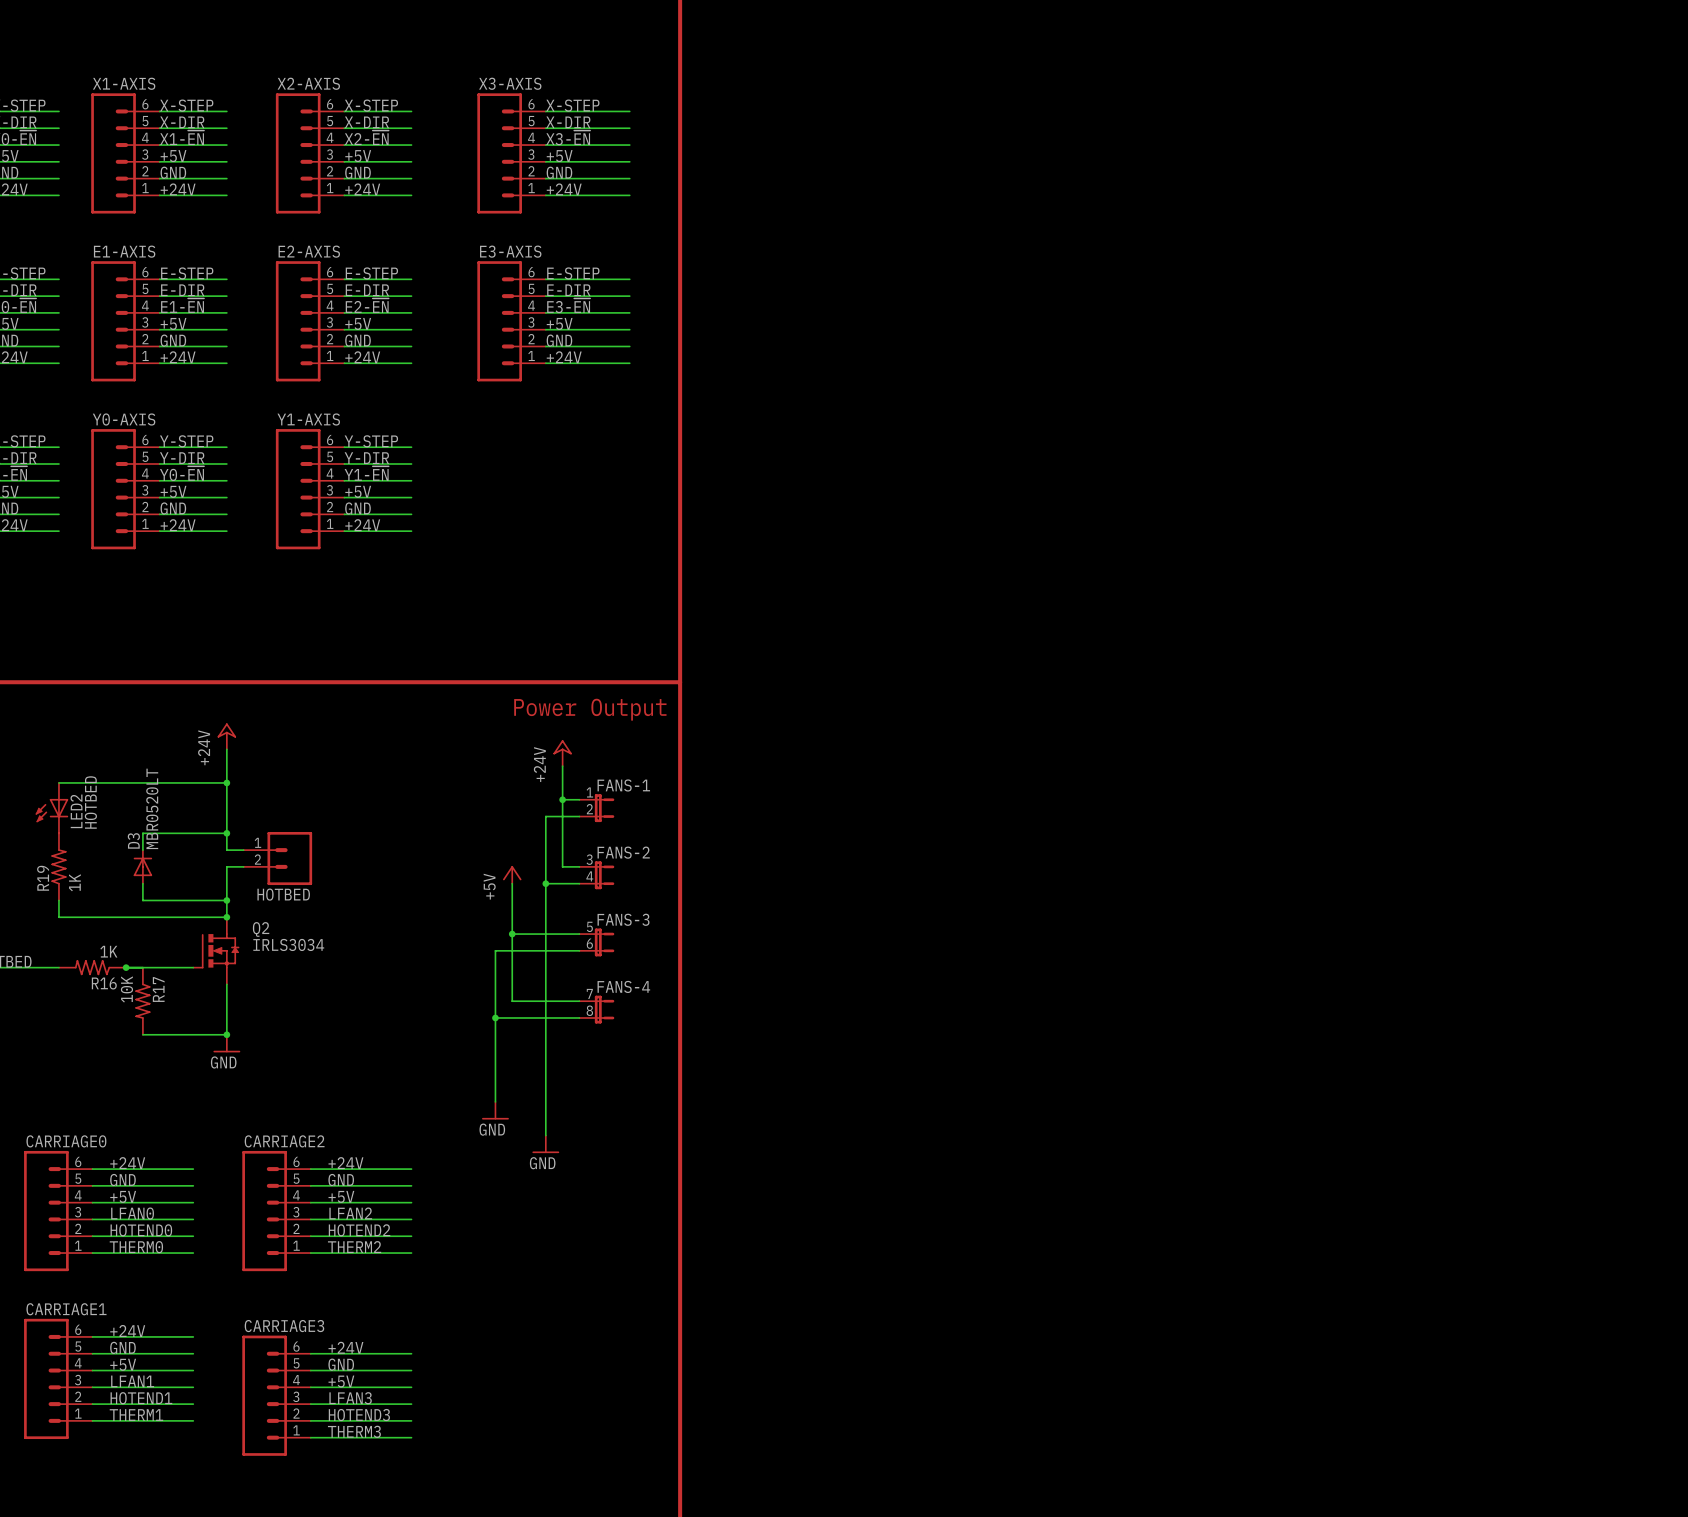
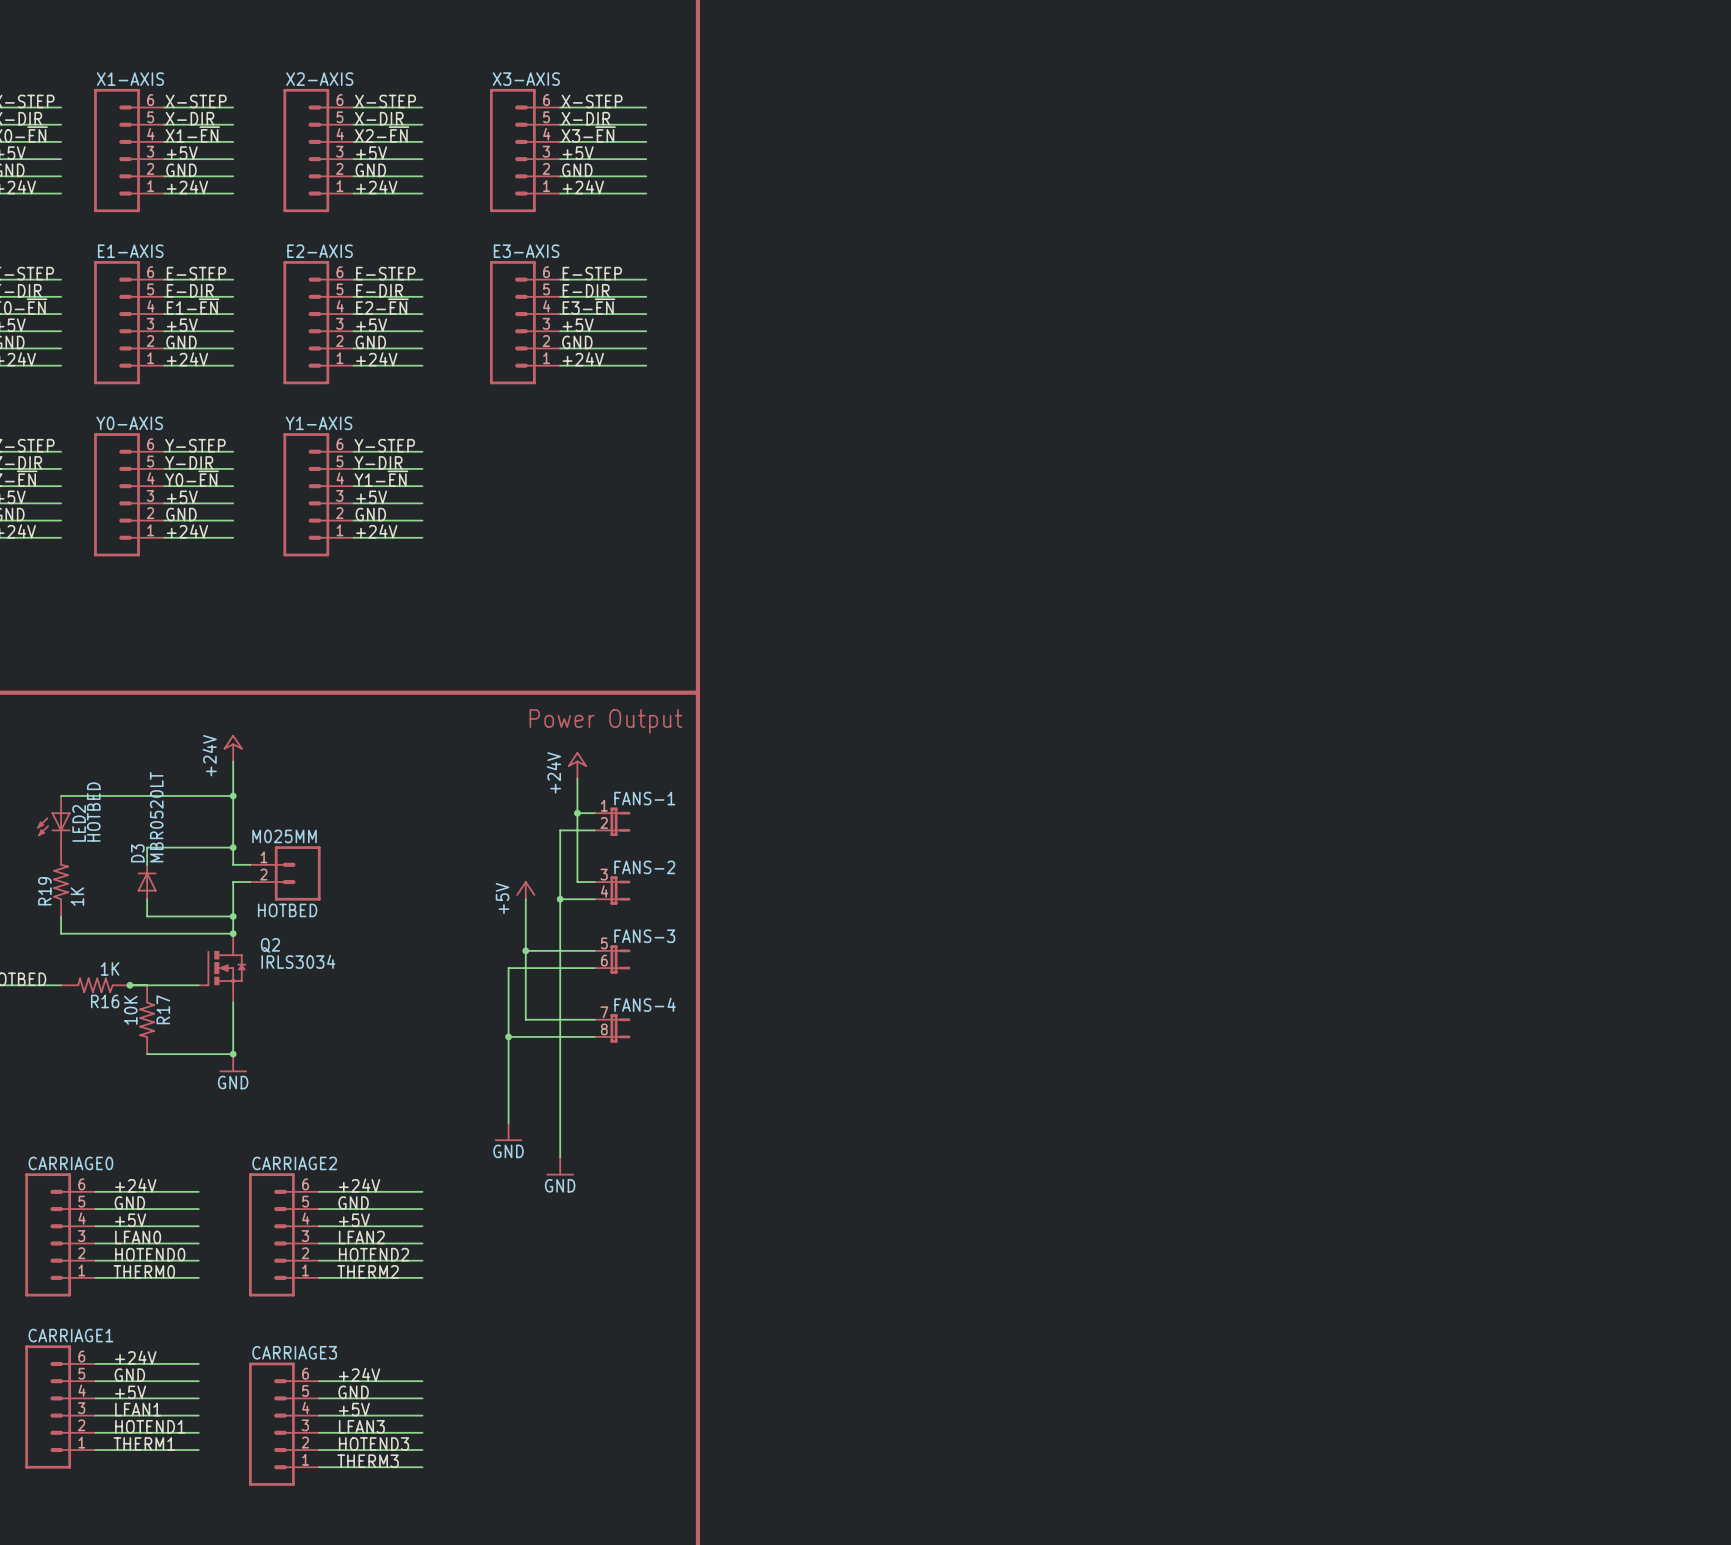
HOTBED value: none -> M025MM (284, 836)

